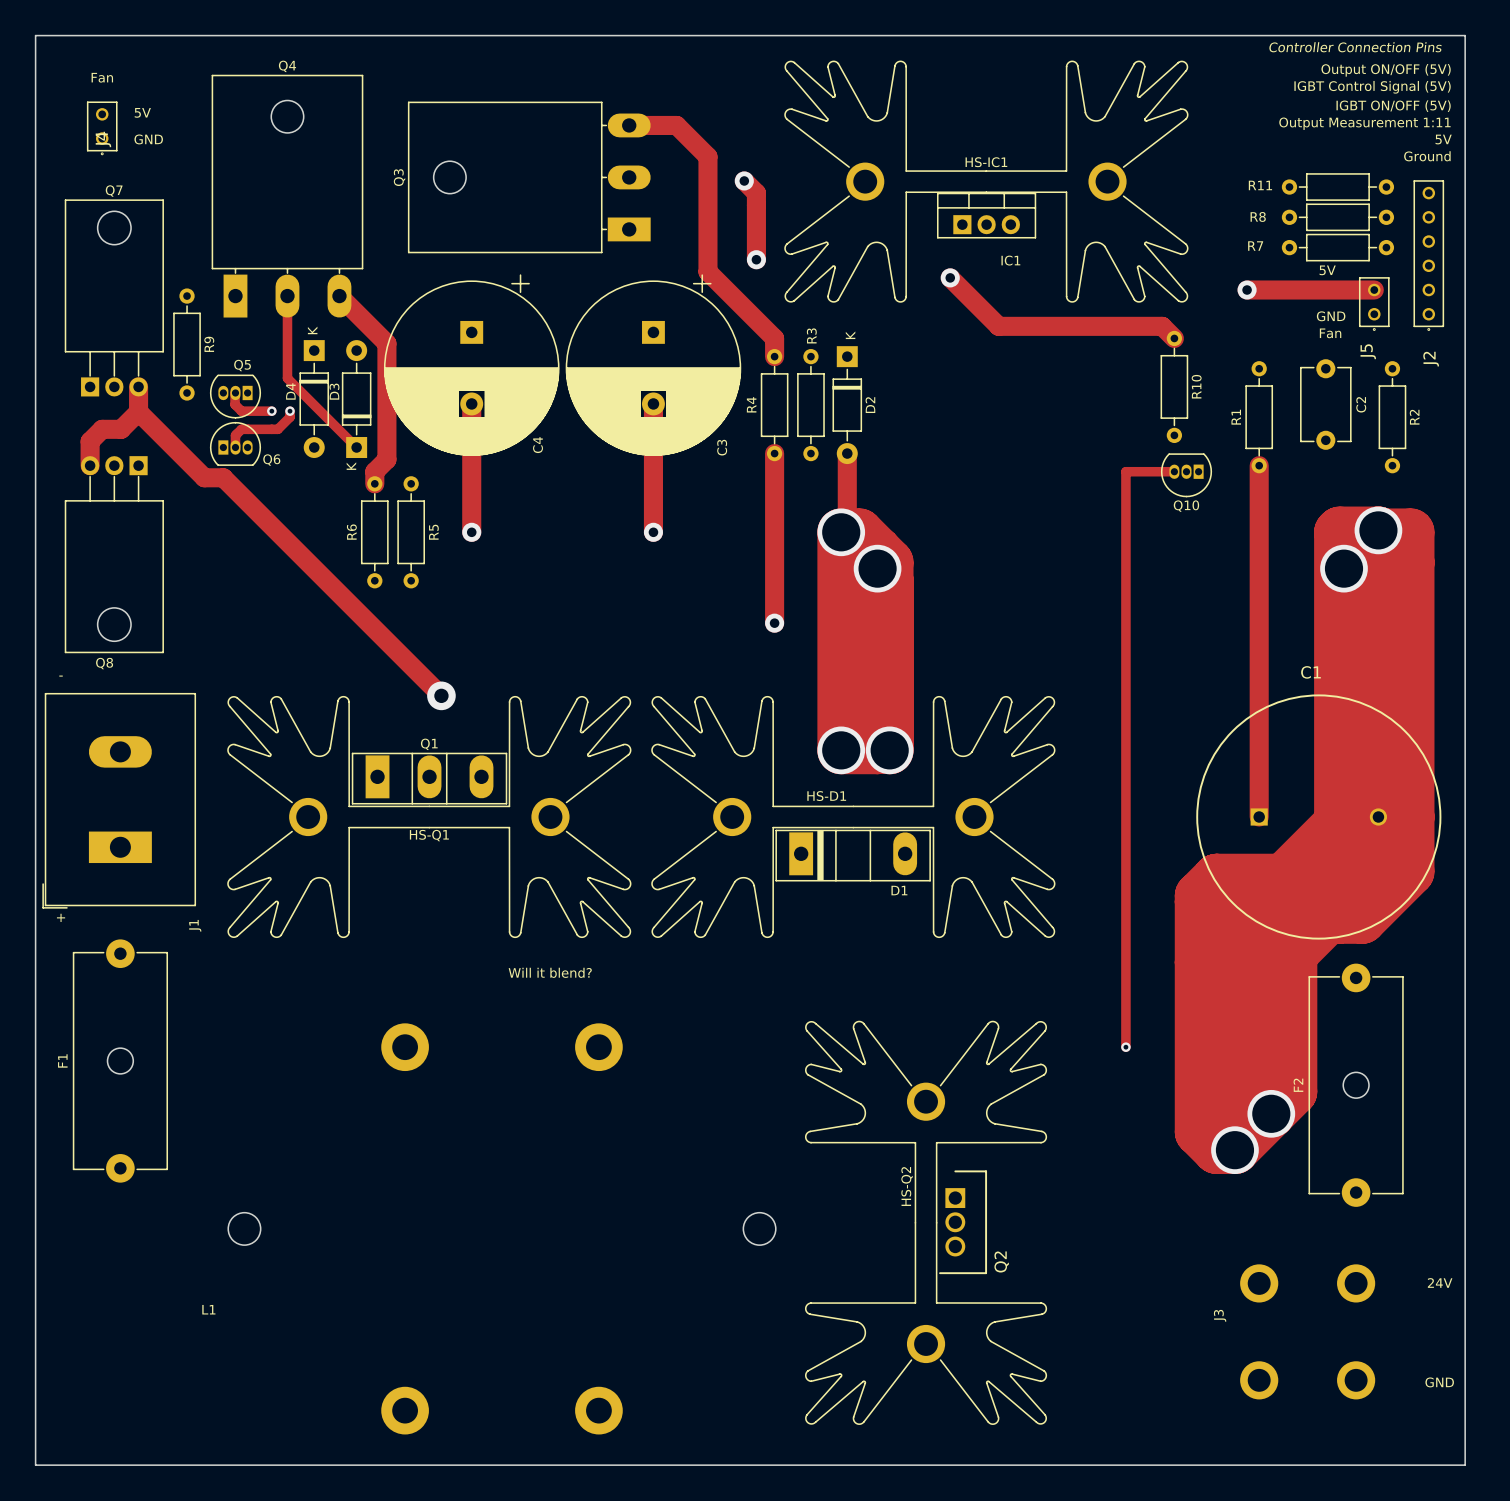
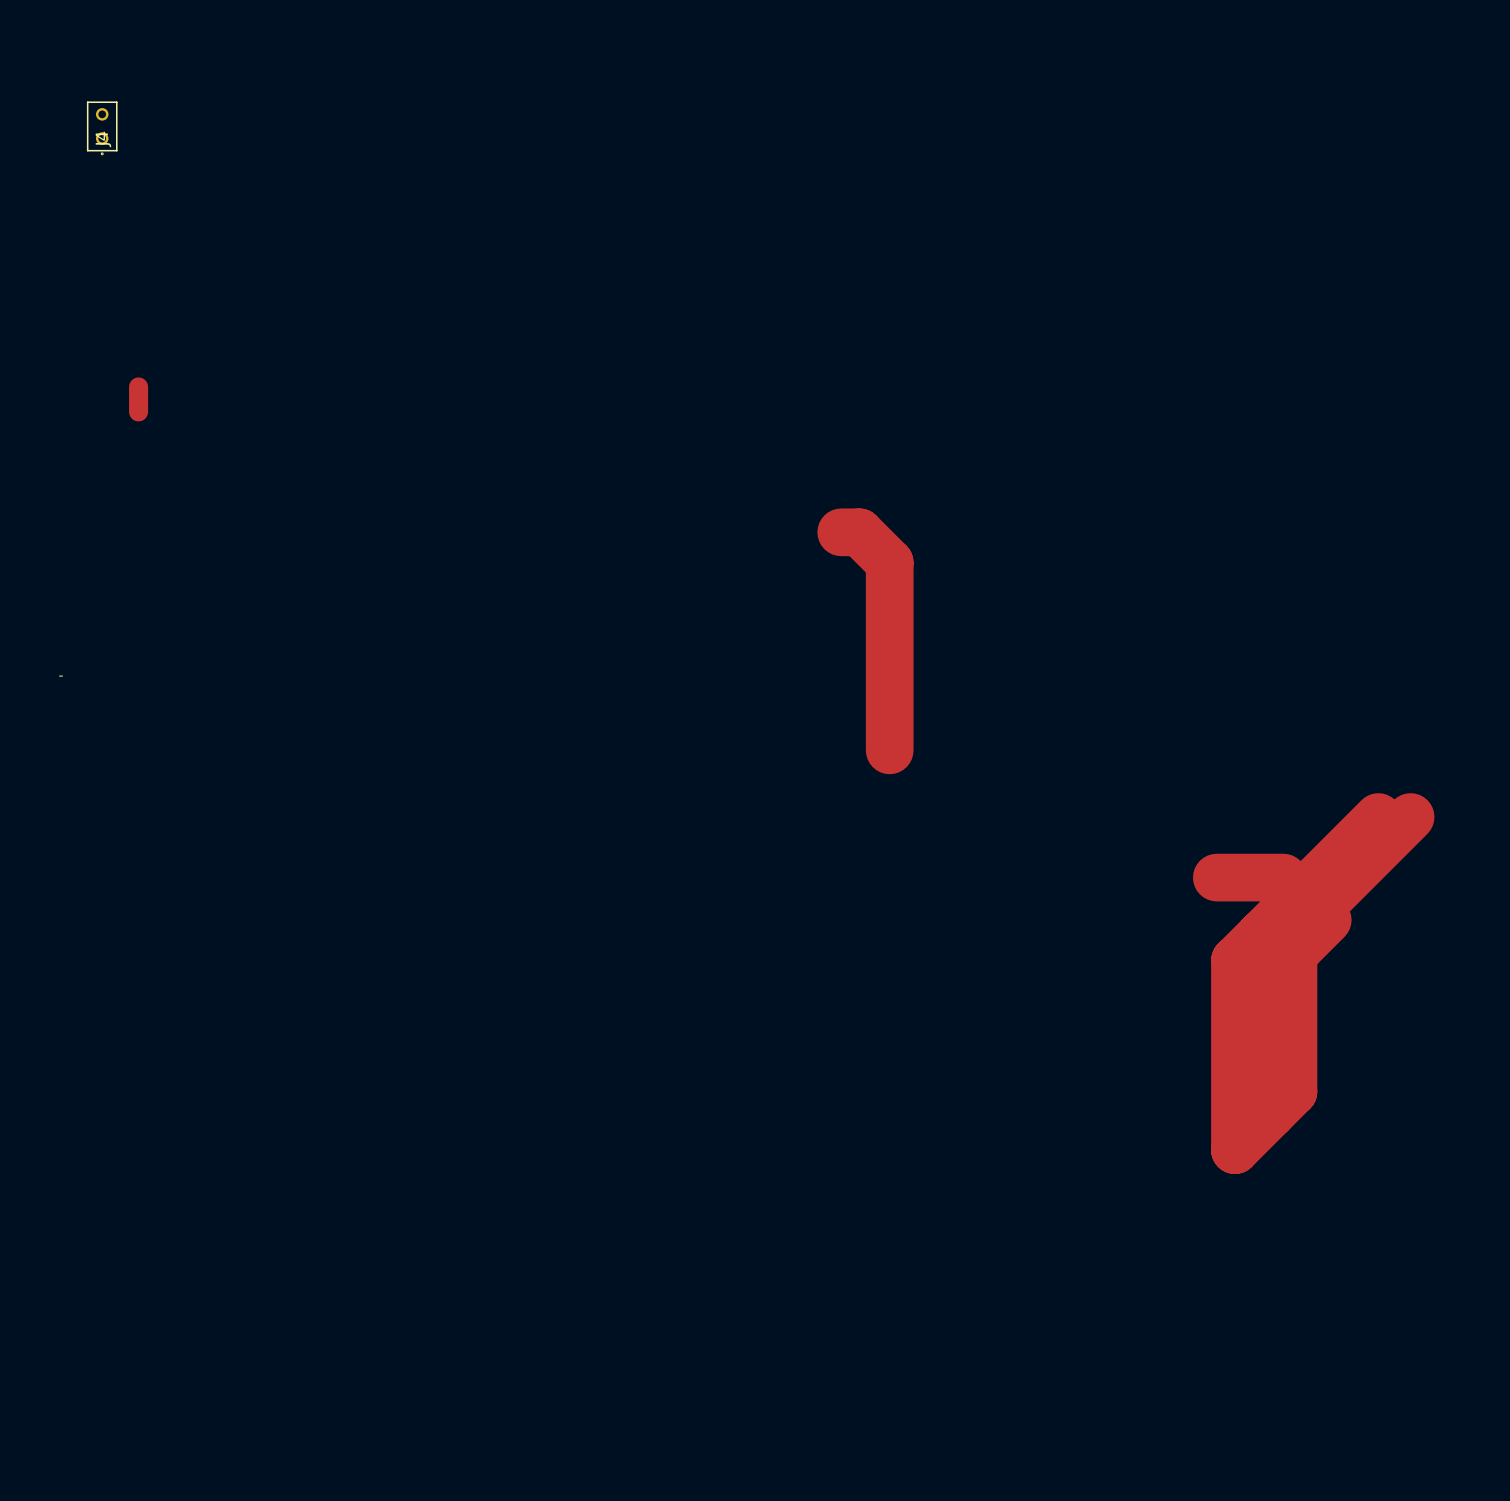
board edge: (35, 35) (1465, 35) (1465, 1465) (35, 1465) (35, 35) -> none
text: Controller Connection Pins (1355, 47) -> none
text: Output ON/OFF (5V) (1386, 70) -> none
text: Fan (102, 77) -> none
text: IGBT Control Signal (5V) (1372, 87) -> none
text: IGBT ON/OFF (5V) (1393, 106) -> none
text: 5V (142, 112) -> none
text: Output Measurement 1:11 (1364, 123) -> none
track: (629, 125) (676, 125) (707, 156) (707, 271) (774, 338) (774, 356) -> none
text: GND (148, 139) -> none
text: 5V (1443, 139) -> none
text: Ground (1427, 156) -> none
Q3: (529, 177) -> none
track: (744, 180) (756, 193) (756, 259) -> none
via: (744, 180) -> none
HS-IC1: (986, 181) -> none
R11: (1337, 187) -> none
Q4: (287, 196) -> none
IC1: (986, 215) -> none
R8: (1337, 217) -> none
R7: (1337, 247) -> none
J2: (1428, 255) -> none
via: (756, 259) -> none
text: 5V (1327, 270) -> none
track: (950, 277) (998, 326) (1162, 326) (1174, 338) -> none
via: (950, 277) -> none
track: (1247, 290) (1374, 290) -> none
via: (1247, 290) -> none
track: (287, 296) (287, 378) (356, 447) -> none
track: (339, 296) (386, 343) (386, 459) (374, 471) (374, 483) -> none
Q7: (114, 298) -> none
J5: (1374, 304) -> none
text: GND (1331, 316) -> none
text: Fan (1330, 333) -> none
R9: (187, 344) -> none
C4: (471, 365) -> none
C3: (653, 365) -> none
R10: (1174, 386) -> none
track: (235, 392) (235, 404) (241, 411) (271, 411) -> none
Q5: (235, 396) -> none
D4: (314, 399) -> none
D3: (356, 399) -> none
track: (471, 403) (471, 532) -> none
track: (653, 403) (653, 532) -> none
C2: (1325, 404) -> none
R4: (774, 405) -> none
R3: (810, 405) -> none
D2: (847, 405) -> none
via: (271, 411) -> none
track: (290, 411) (290, 417) (277, 429) (241, 429) (235, 435) (235, 447) -> none
via: (290, 411) -> none
R1: (1259, 417) -> none
R2: (1392, 417) -> none
Q6: (235, 443) -> none
track: (774, 453) (774, 623) -> none
track: (847, 453) (847, 526) (841, 532) (841, 750) (877, 750) (877, 550) -> none
track: (90, 465) (90, 441) (102, 429) (121, 429) (138, 411) (204, 477) (223, 477) (441, 695) -> none
track: (1259, 465) (1259, 817) -> none
track: (1174, 471) (1125, 471) (1125, 1047) -> none
Q10: (1186, 475) -> none
track: (1378, 530) (1378, 849) -> none
track: (1378, 530) (1339, 530) (1337, 532) (1337, 823) (1198, 962) -> none
via: (1378, 530) -> none
R6: (374, 532) -> none
R5: (411, 532) -> none
via: (471, 532) -> none
via: (653, 532) -> none
via: (841, 532) -> none
track: (1380, 532) (1410, 532) (1410, 871) (1362, 919) (1307, 919) -> none
Q8: (114, 554) -> none
via: (877, 568) -> none
via: (1344, 568) -> none
via: (774, 623) -> none
via: (441, 695) -> none
via: (841, 750) -> none
via: (889, 750) -> none
Q1: (429, 778) -> none
J1: (119, 800) -> none
HS-Q1: (429, 817) -> none
HS-D1: (853, 817) -> none
C1: (1318, 817) -> none
D1: (853, 855) -> none
track: (1198, 901) (1216, 883) (1216, 877) (1198, 895) (1198, 1131) (1216, 1150) (1234, 1150) -> none
text: + (61, 917) -> none
text: Will it blend? (550, 972) -> none
via: (1125, 1047) -> none
F1: (120, 1061) -> none
F2: (1356, 1085) -> none
via: (1271, 1113) -> none
via: (1234, 1150) -> none
HS-Q2: (926, 1222) -> none
Q2: (963, 1222) -> none
L1: (502, 1228) -> none
text: 24V (1440, 1282) -> none
J3: (1307, 1331) -> none
text: GND (1439, 1382) -> none

